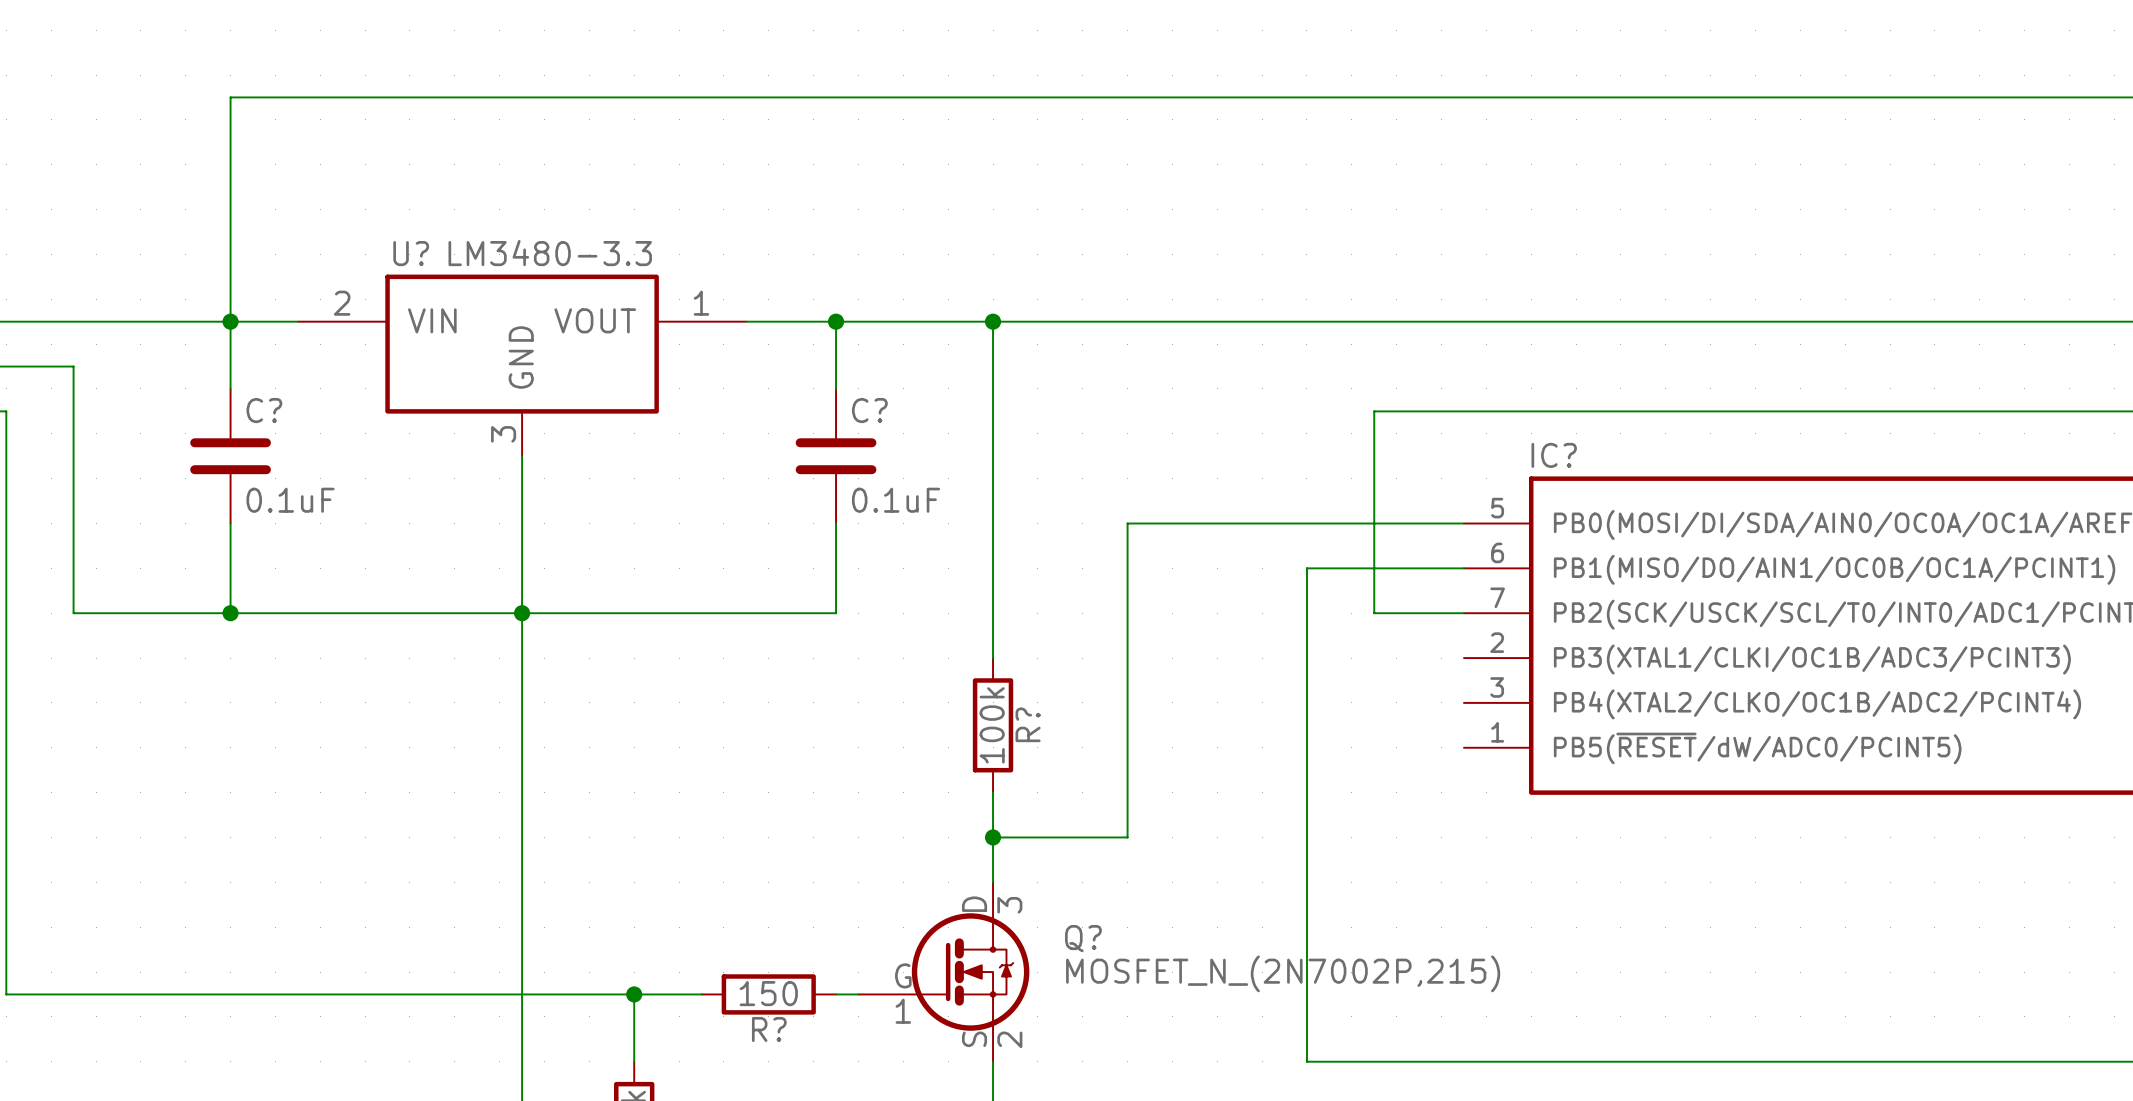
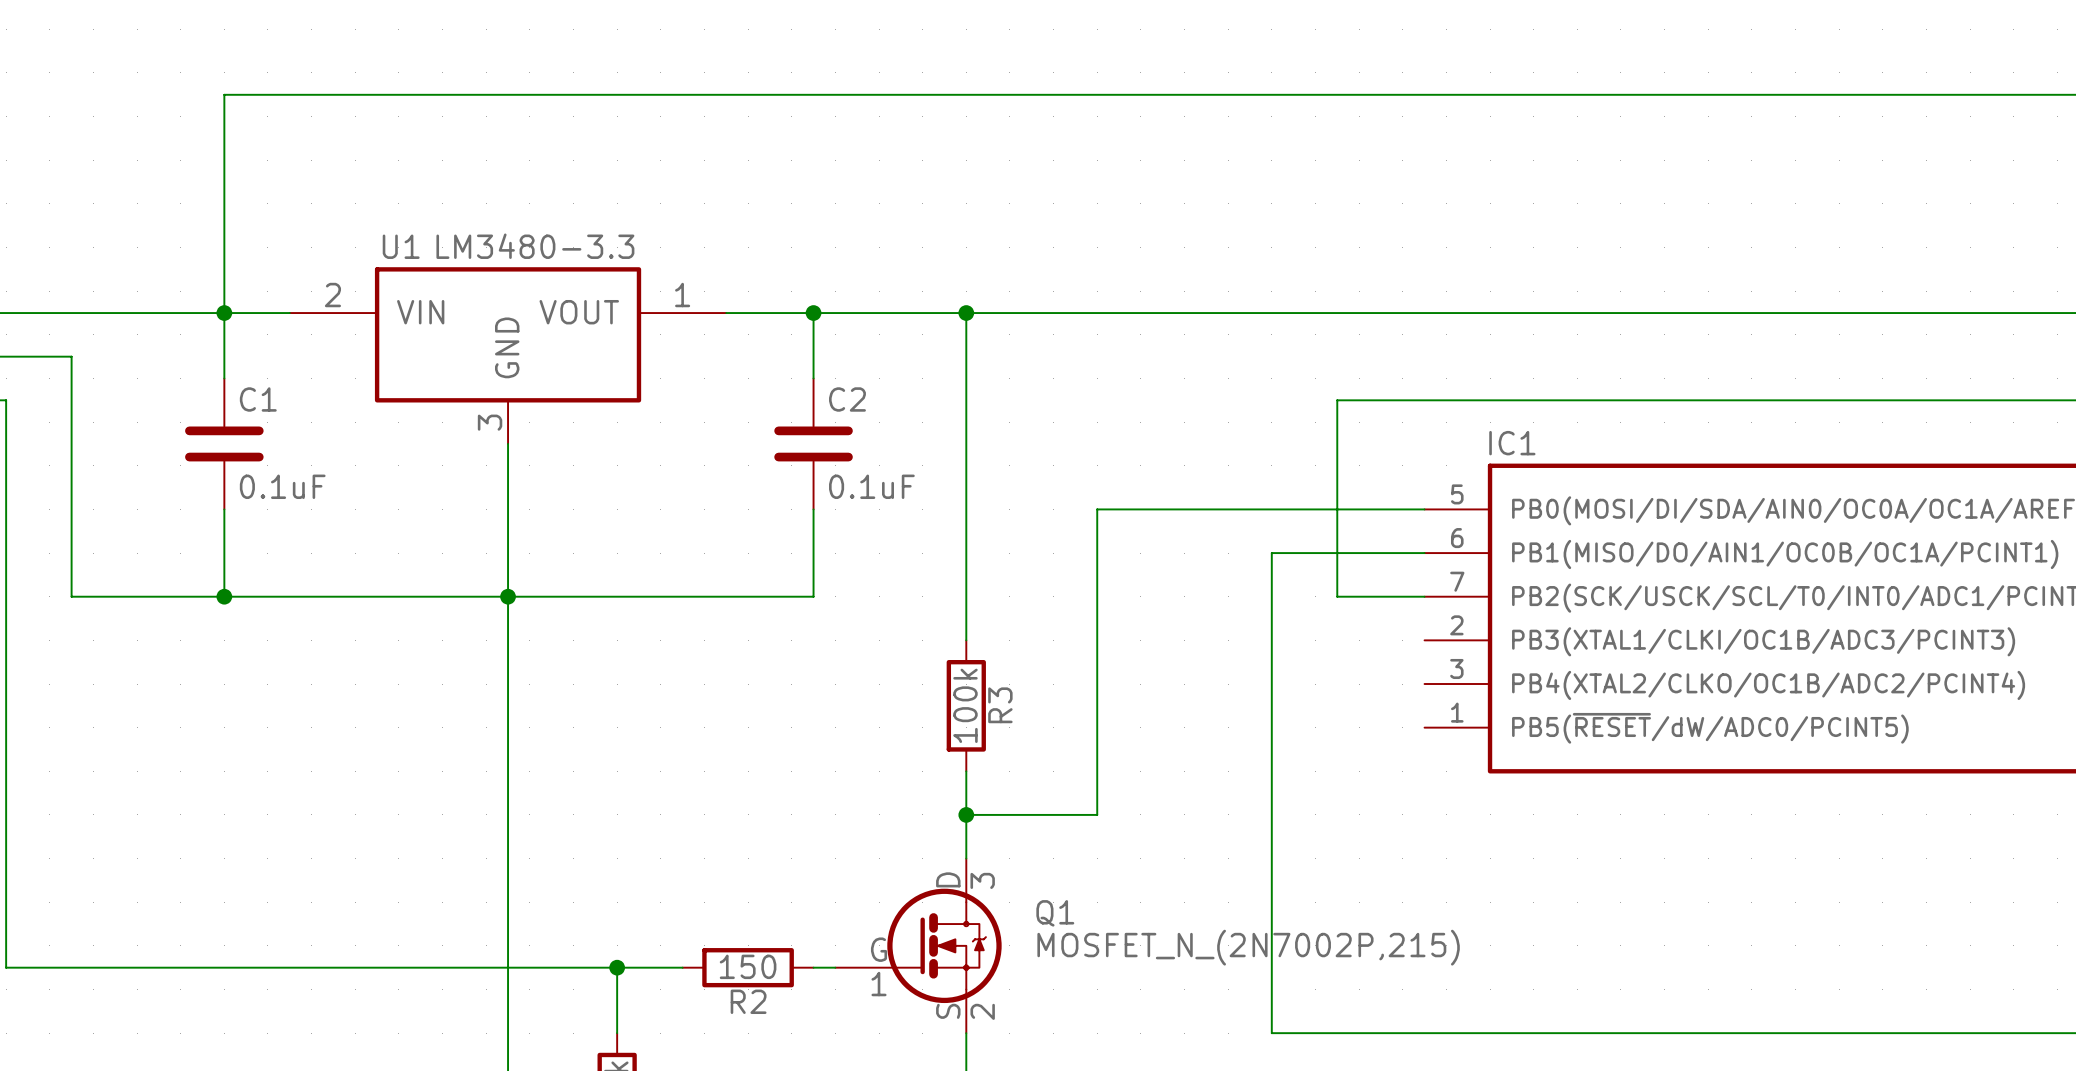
U? name: U? (411, 253) -> U1 (401, 246)
C? name: C? (264, 410) -> C1 (258, 399)
C? name: C? (869, 410) -> C2 (847, 399)
IC? name: IC? (1554, 455) -> IC1 (1512, 443)
R? name: R? (1028, 724) -> R3 (1000, 705)
Q? name: Q? (1083, 938) -> Q1 (1055, 913)
R? name: R? (769, 1029) -> R2 (748, 1001)

